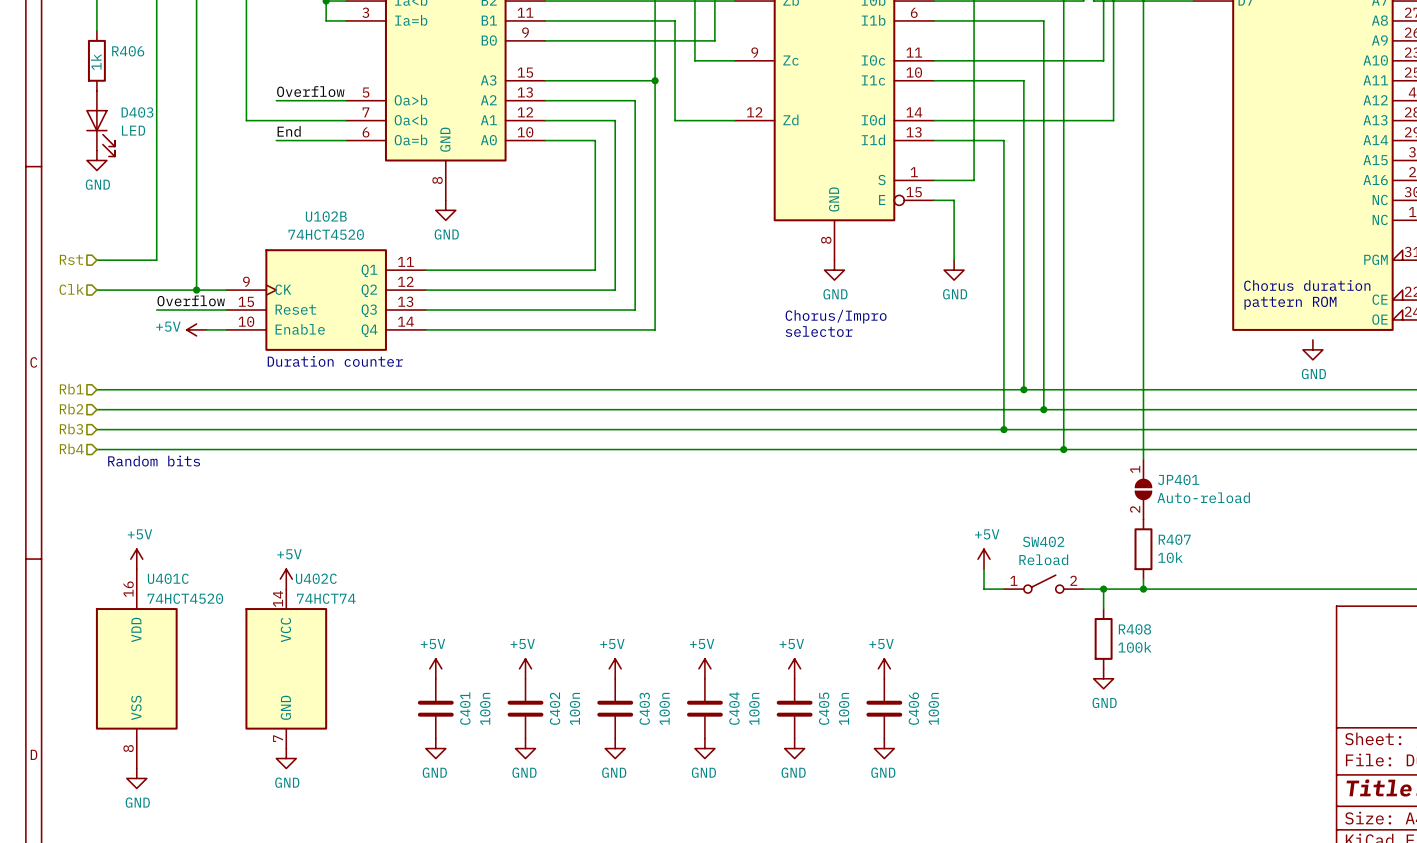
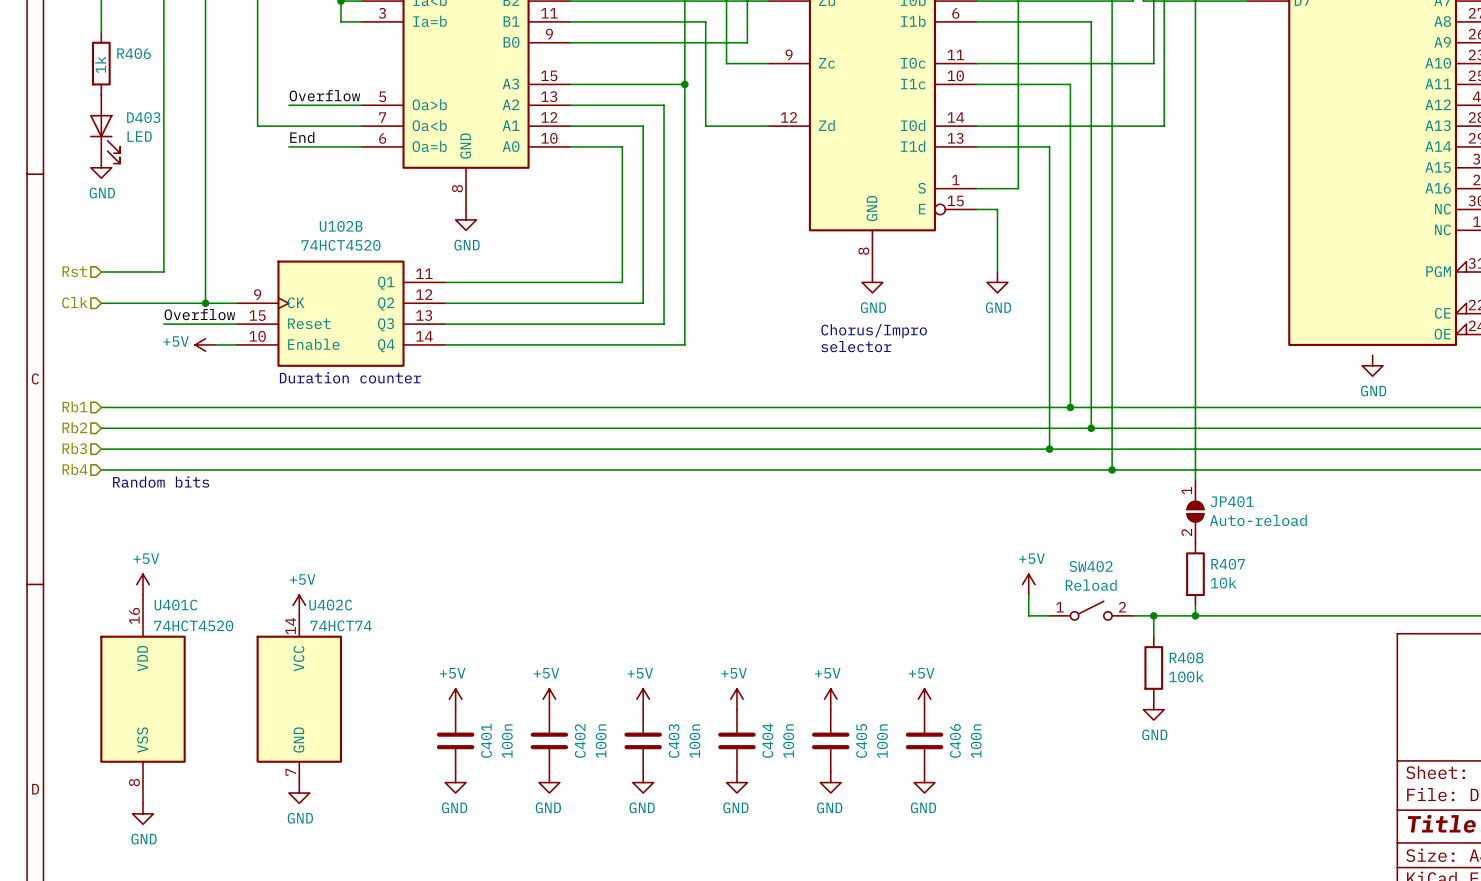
text: Chorus duration (1307, 285) -> none
text: pattern ROM (1290, 303) -> none

